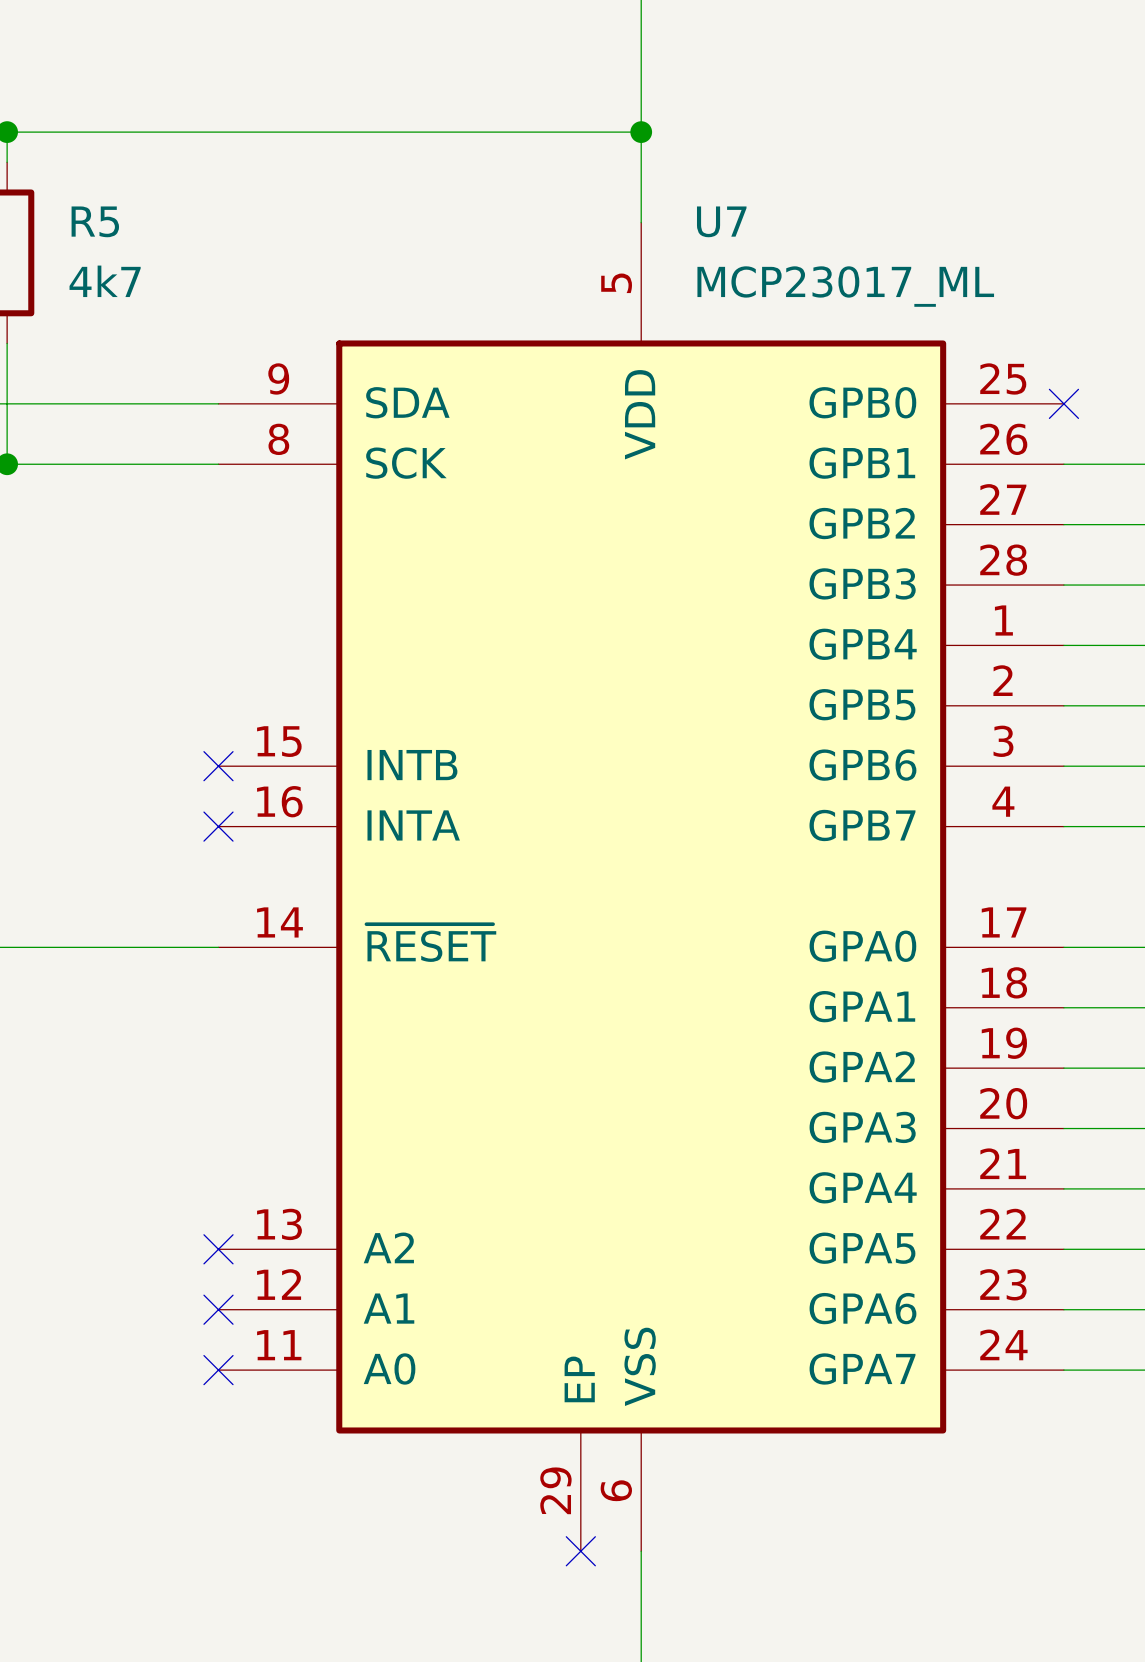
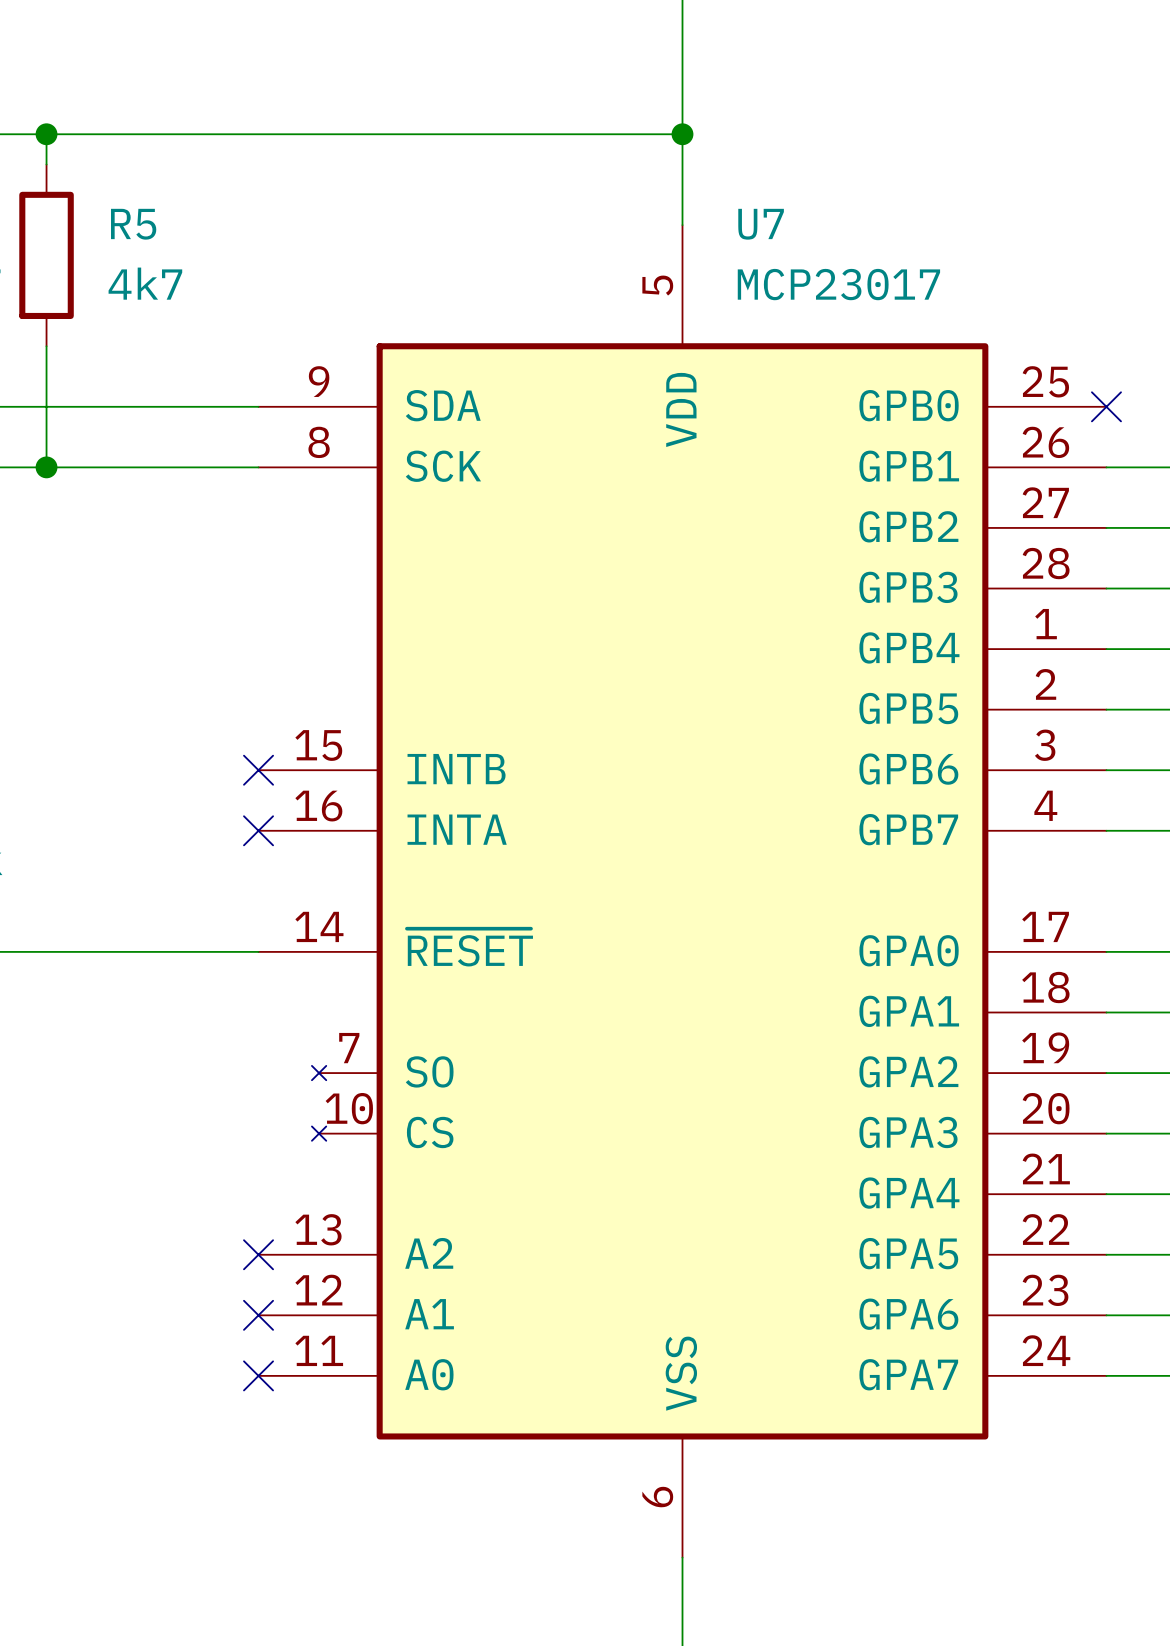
U7 symbol: [218, 222, 1064, 1552] -> [258, 225, 1107, 1558]
U7 value: MCP23017_ML (845, 286) -> MCP23017 (838, 284)
no-connect mark: (580, 1551) -> none

